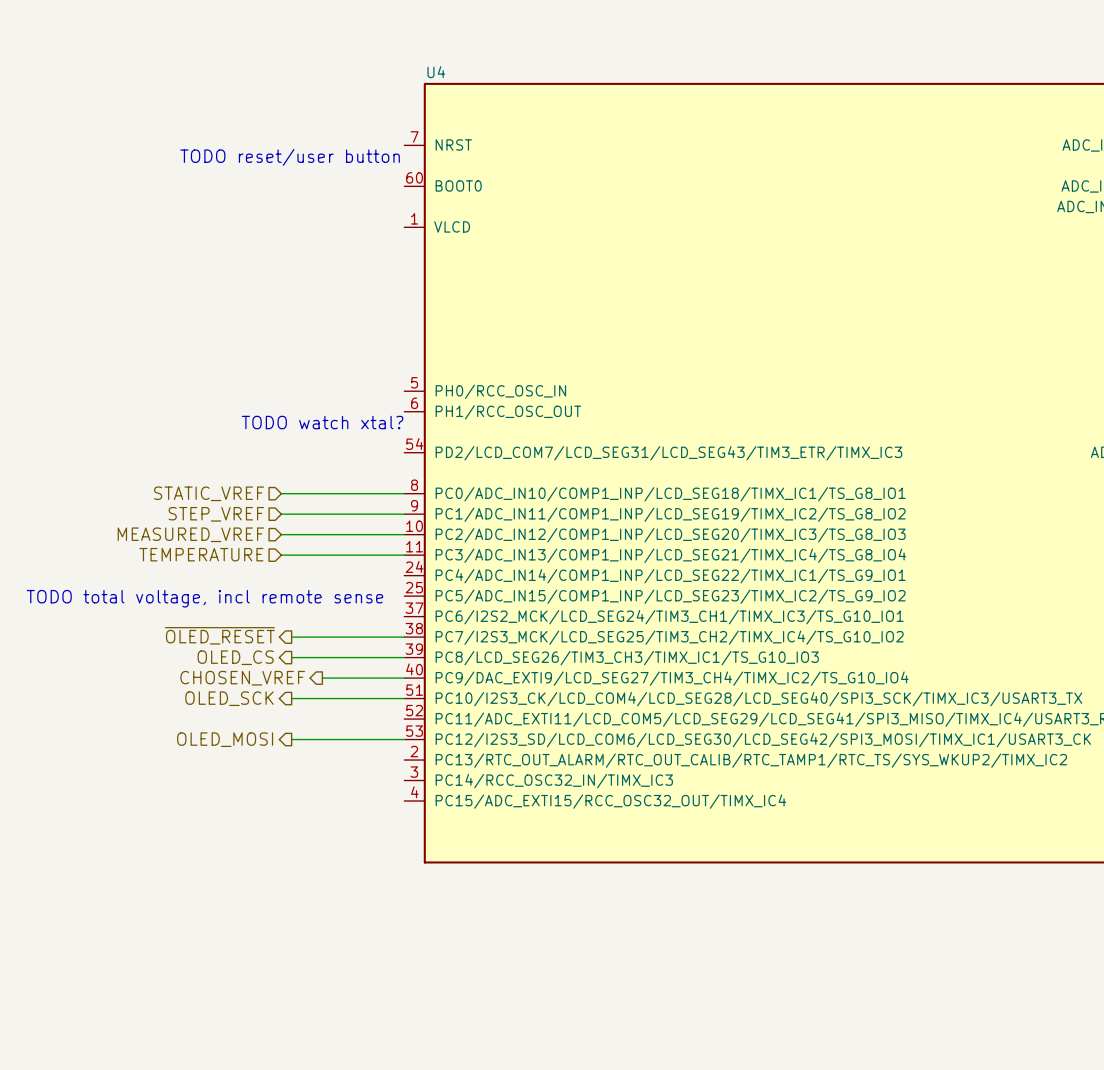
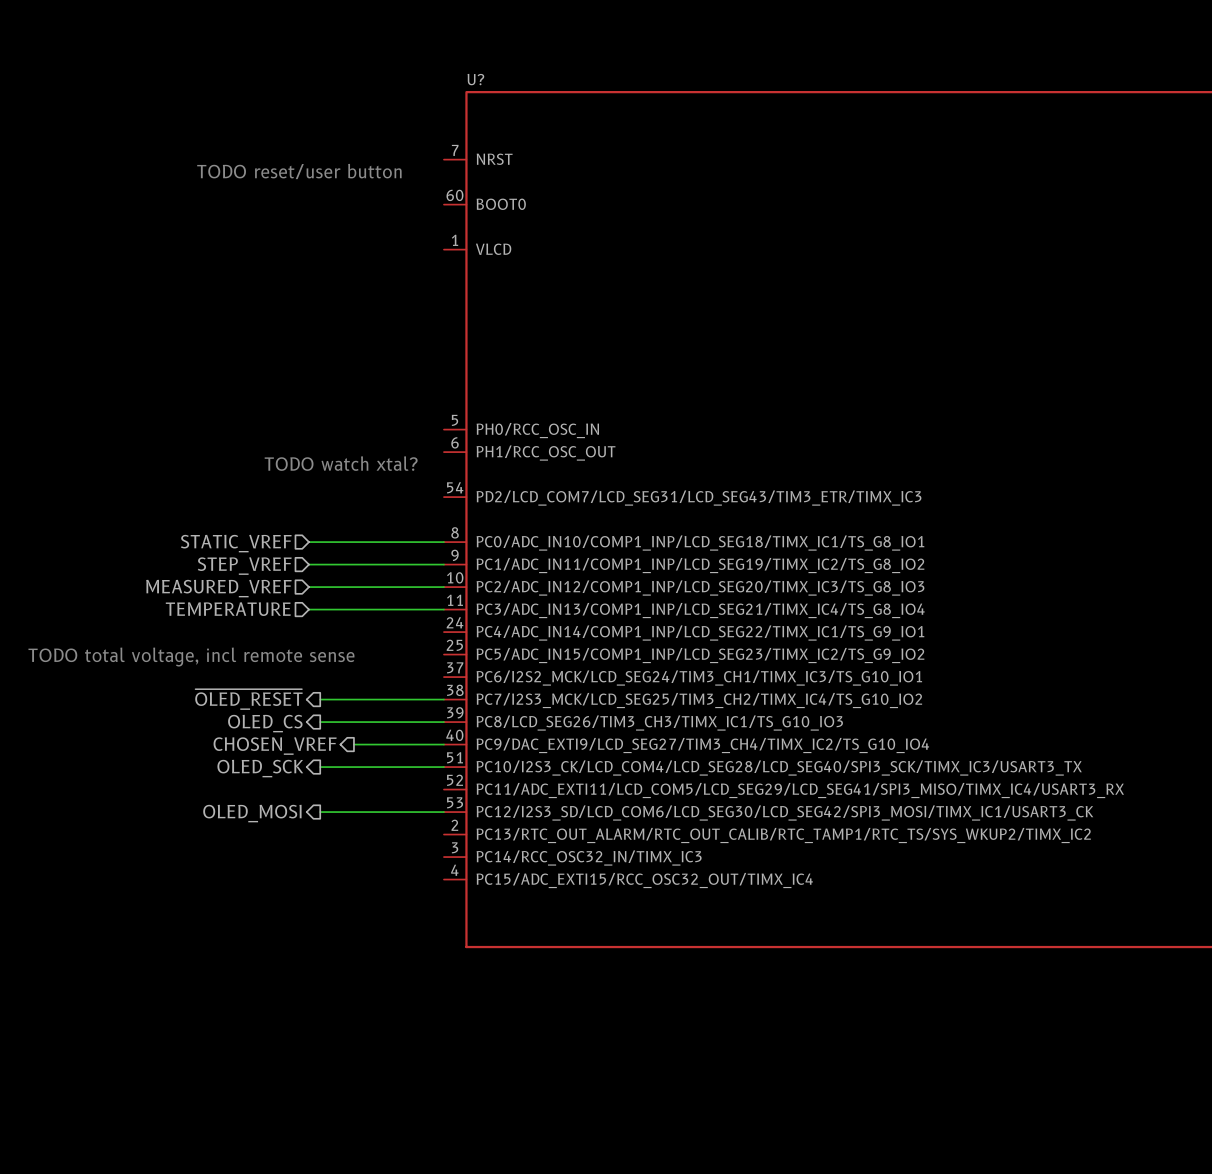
U4 name: U4 (436, 72) -> U? (475, 79)

